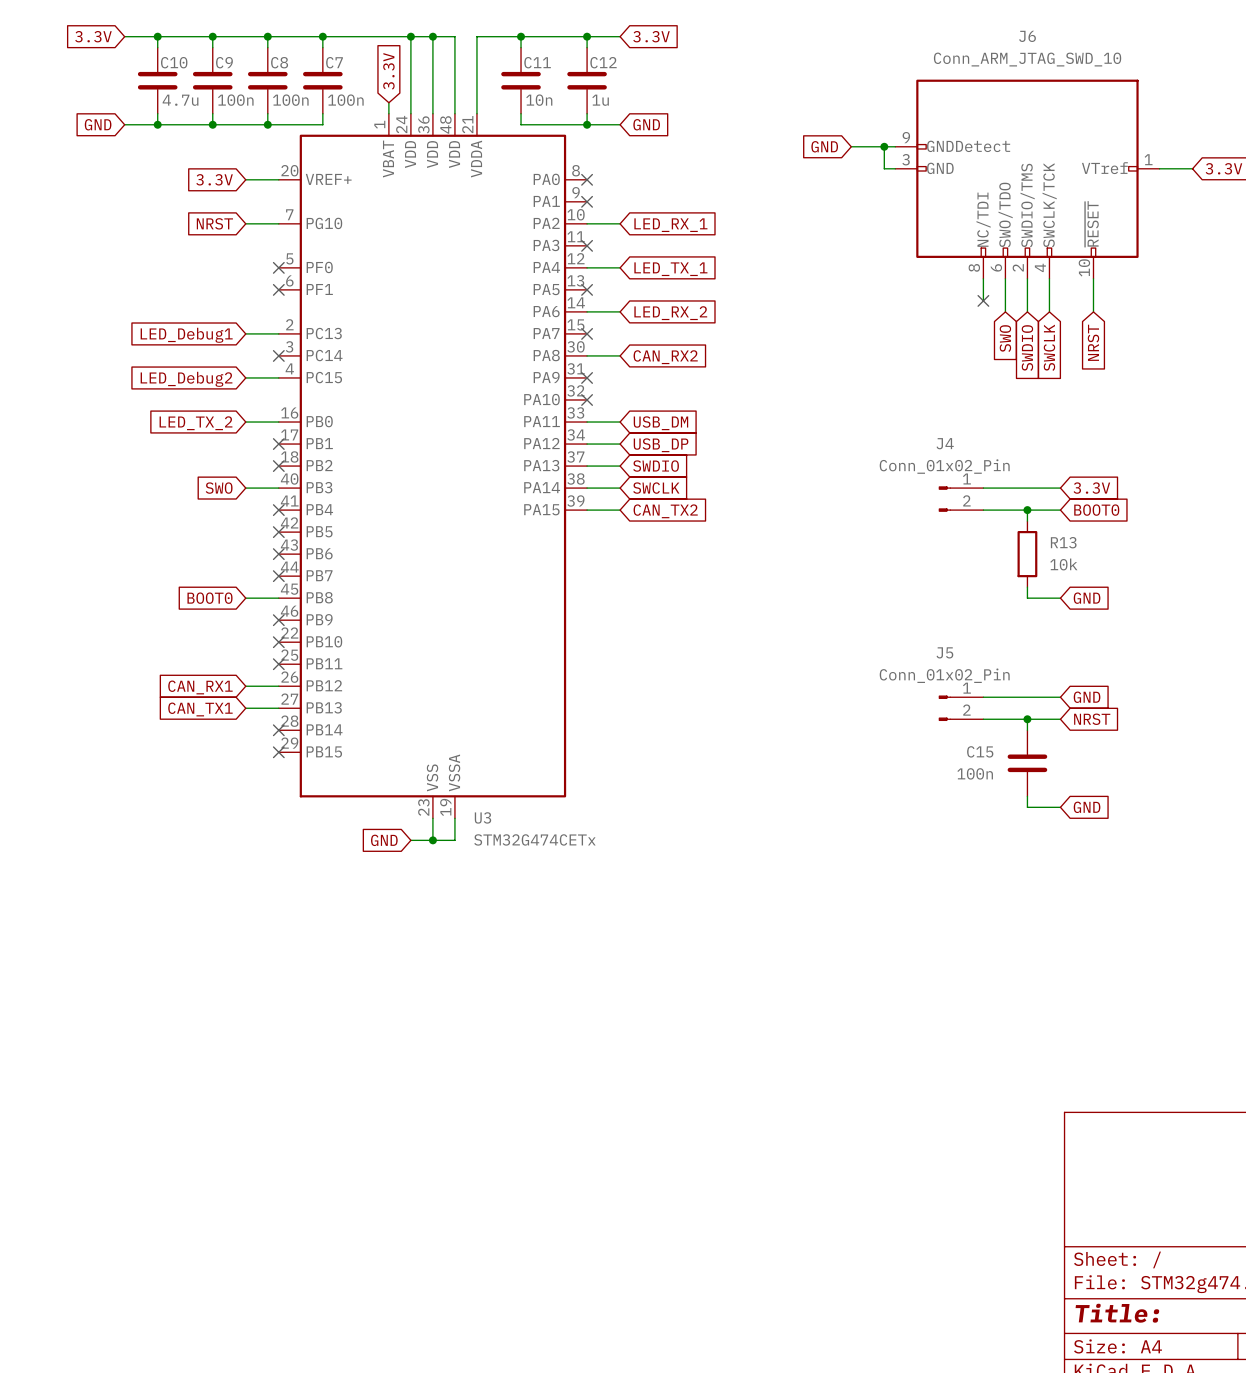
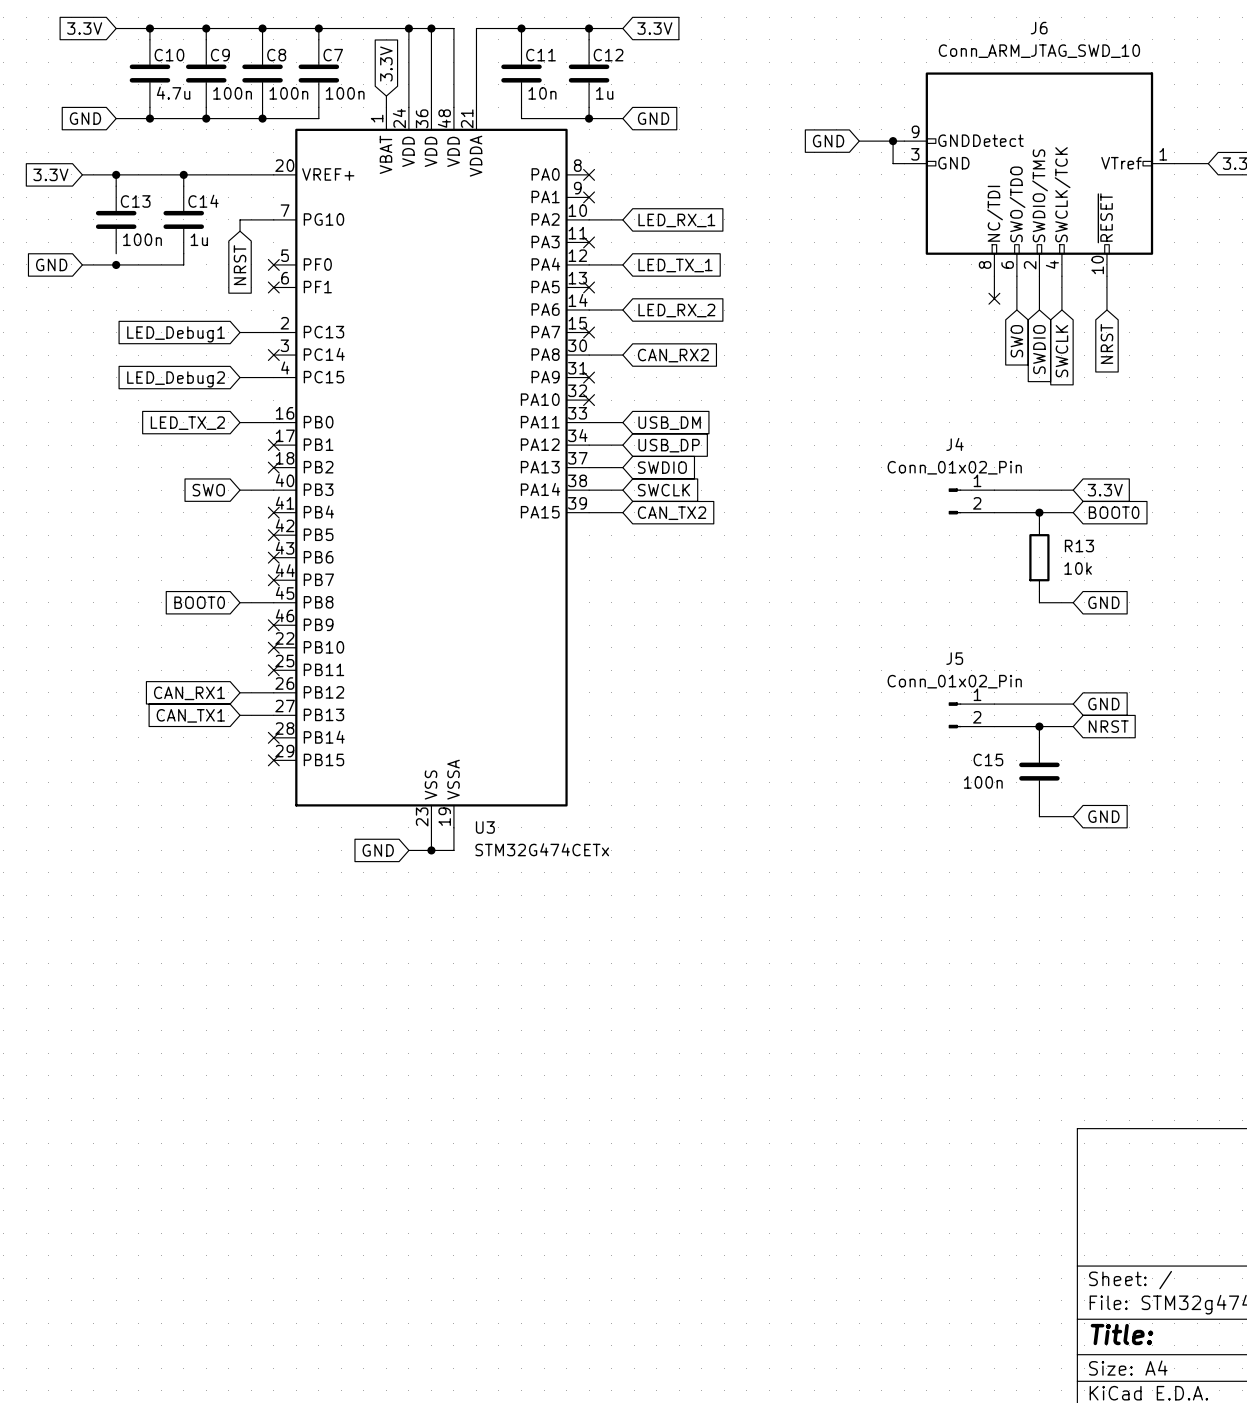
wire: none -> (82, 174) (240, 174)
wire: none -> (116, 174) (116, 186)
junction: none -> (116, 174)
wire: none -> (183, 174) (183, 186)
junction: none -> (183, 174)
global label position: 3.3V (214, 179) -> 3.3V (50, 174)
C13: none -> 100n (116, 219)
C14: none -> 1u (183, 219)
global label rotation: 0° (214, 223) -> 90° counterclockwise (240, 265)
wire: none -> (240, 219) (240, 231)
wire: none -> (183, 253) (183, 264) (82, 264)
global label: none -> GND (51, 264)
junction: none -> (116, 264)

